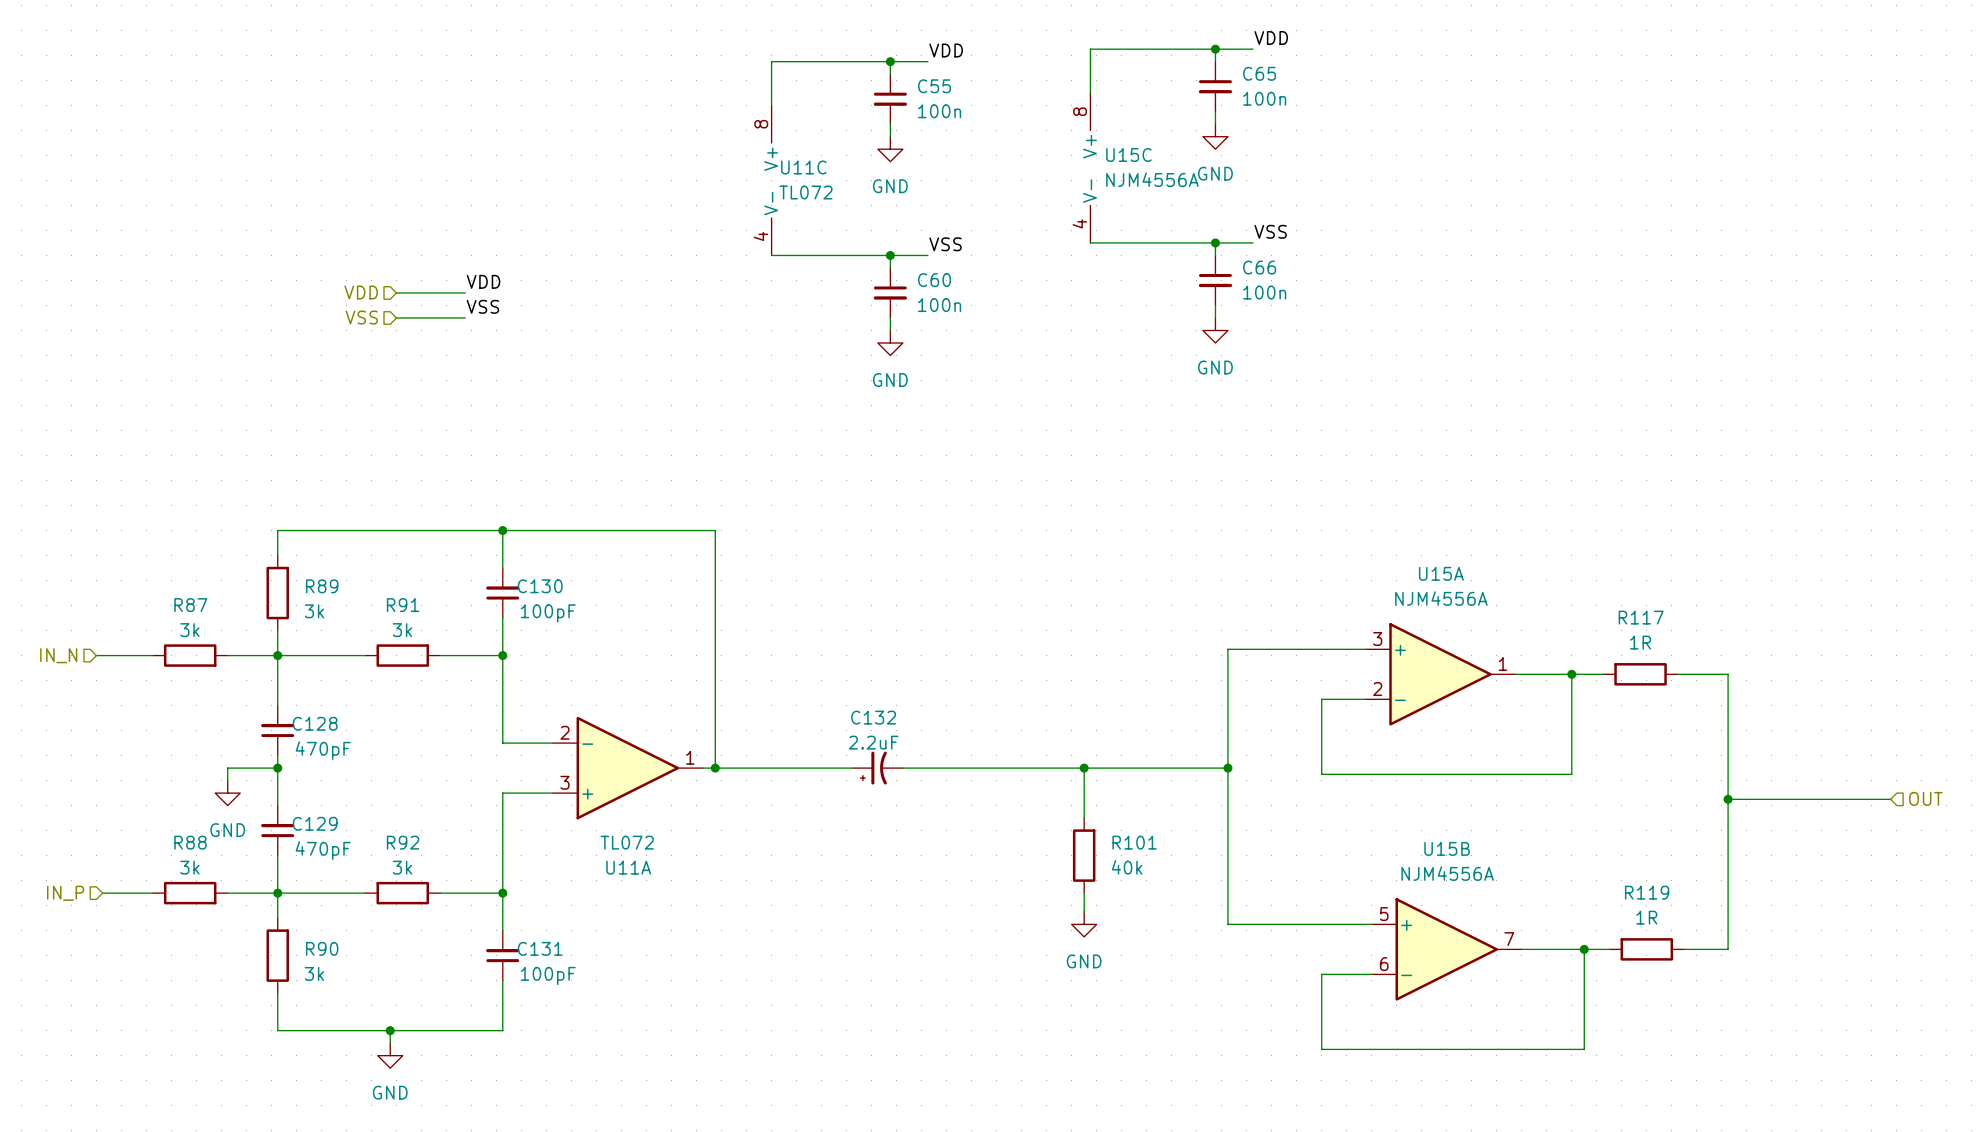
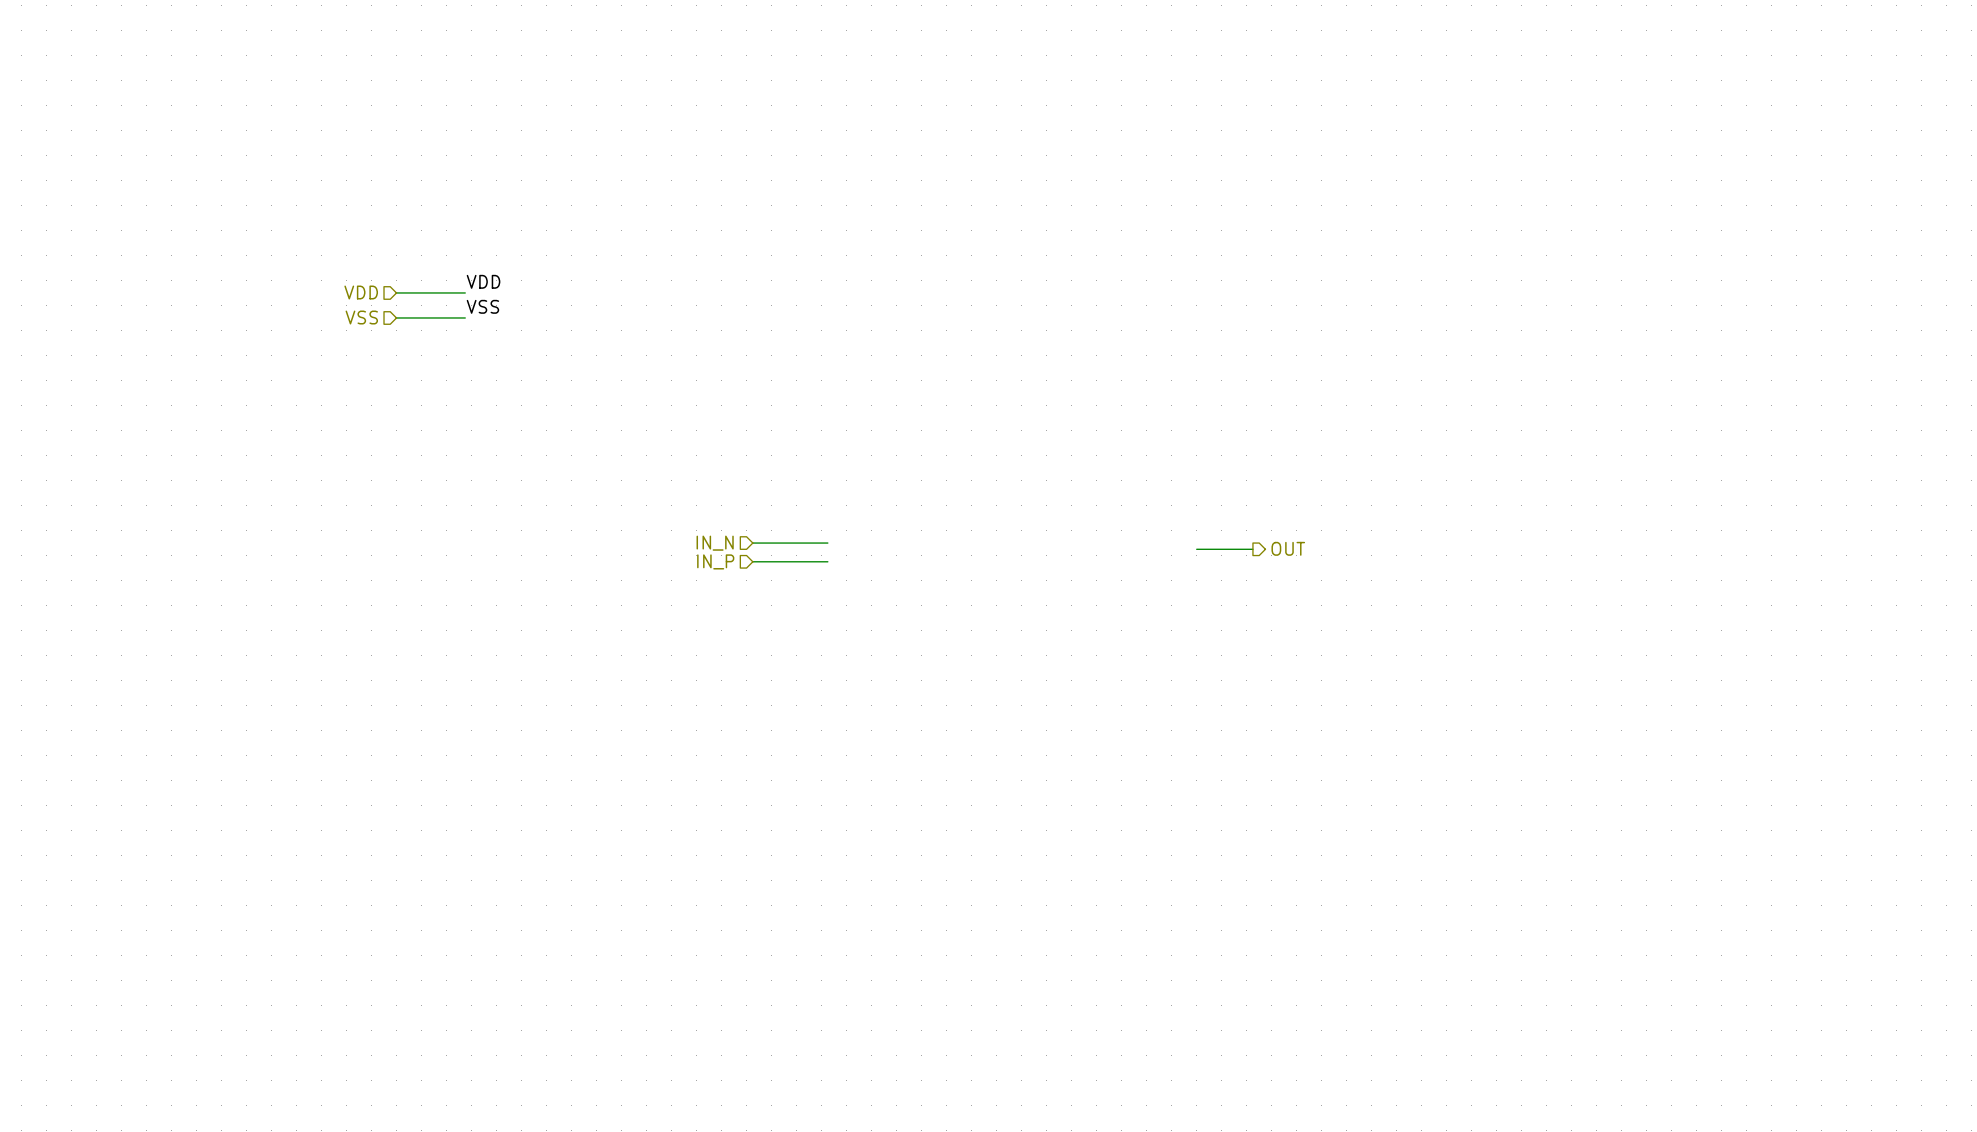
label: VDD (1271, 38) -> none
wire: (1215, 49) (1215, 61) -> none
junction: (1215, 49) -> none
wire: (1252, 49) (1090, 49) (1090, 92) -> none
label: VDD (946, 50) -> none
wire: (890, 61) (890, 74) -> none
junction: (890, 61) -> none
wire: (927, 61) (771, 61) (771, 105) -> none
C65: 100n (1215, 86) -> none
C55: 100n (890, 99) -> none
wire: (1215, 111) (1215, 124) -> none
wire: (890, 124) (890, 136) -> none
power symbol: GND (1215, 136) -> none
power symbol: GND (890, 149) -> none
U15C: NJM4556A (1090, 167) -> none
U11C: TL072 (771, 180) -> none
label: VSS (1270, 231) -> none
wire: (1090, 242) (1252, 242) -> none
wire: (1215, 242) (1215, 255) -> none
junction: (1215, 242) -> none
label: VSS (945, 244) -> none
wire: (771, 255) (927, 255) -> none
wire: (890, 255) (890, 267) -> none
junction: (890, 255) -> none
C66: 100n (1215, 280) -> none
C60: 100n (890, 292) -> none
wire: (1215, 305) (1215, 317) -> none
wire: (890, 317) (890, 330) -> none
power symbol: GND (1215, 330) -> none
power symbol: GND (890, 342) -> none
wire: (502, 530) (502, 568) -> none
junction: (502, 530) -> none
hierarchical label: none -> IN_N (715, 543)
wire: none -> (752, 543) (827, 543)
hierarchical label: none -> OUT (1288, 548)
wire: none -> (1196, 549) (1252, 549)
wire: (277, 555) (277, 530) (715, 530) (715, 768) -> none
hierarchical label: none -> IN_P (715, 561)
wire: none -> (752, 561) (827, 561)
R89: 3k (277, 593) -> none
C130: 100pF (502, 593) -> none
wire: (502, 618) (502, 743) (552, 743) -> none
wire: (277, 630) (277, 705) -> none
wire: (1365, 649) (1227, 649) (1227, 924) (1371, 924) -> none
hierarchical label: IN_N (58, 655) -> none
wire: (96, 655) (152, 655) -> none
R87: 3k (190, 655) -> none
wire: (227, 655) (365, 655) -> none
junction: (277, 655) -> none
R91: 3k (402, 655) -> none
wire: (440, 655) (502, 655) -> none
junction: (502, 655) -> none
U15A: NJM4556A (1440, 674) -> none
wire: (1515, 674) (1603, 674) -> none
wire: (1571, 674) (1571, 774) (1321, 774) (1321, 699) (1365, 699) -> none
junction: (1571, 674) -> none
R117: 1R (1640, 674) -> none
wire: (1678, 674) (1728, 674) (1728, 949) (1684, 949) -> none
C128: 470pF (277, 730) -> none
wire: (277, 755) (277, 805) -> none
wire: (277, 768) (227, 768) (227, 780) -> none
junction: (277, 768) -> none
U11A: TL072 (627, 768) -> none
wire: (702, 768) (852, 768) -> none
junction: (715, 768) -> none
C132: 2.2uF (877, 768) -> none
wire: (902, 768) (1227, 768) -> none
wire: (1084, 768) (1084, 818) -> none
junction: (1084, 768) -> none
junction: (1227, 768) -> none
power symbol: GND (227, 793) -> none
wire: (552, 793) (502, 793) (502, 930) -> none
hierarchical label: OUT (1925, 798) -> none
wire: (1728, 799) (1890, 799) -> none
junction: (1728, 799) -> none
C129: 470pF (277, 830) -> none
wire: (277, 855) (277, 918) -> none
R101: 40k (1084, 855) -> none
hierarchical label: IN_P (65, 893) -> none
wire: (102, 893) (152, 893) -> none
R88: 3k (190, 893) -> none
wire: (227, 893) (365, 893) -> none
junction: (277, 893) -> none
R92: 3k (402, 893) -> none
wire: (440, 893) (502, 893) -> none
junction: (502, 893) -> none
wire: (1084, 893) (1084, 911) -> none
power symbol: GND (1084, 924) -> none
U15B: NJM4556A (1446, 949) -> none
wire: (1521, 949) (1609, 949) -> none
wire: (1584, 949) (1584, 1049) (1321, 1049) (1321, 974) (1371, 974) -> none
junction: (1584, 949) -> none
R119: 1R (1646, 949) -> none
R90: 3k (277, 955) -> none
C131: 100pF (502, 955) -> none
wire: (502, 980) (502, 1030) (277, 1030) (277, 993) -> none
wire: (390, 1030) (390, 1043) -> none
junction: (390, 1030) -> none
power symbol: GND (390, 1055) -> none

